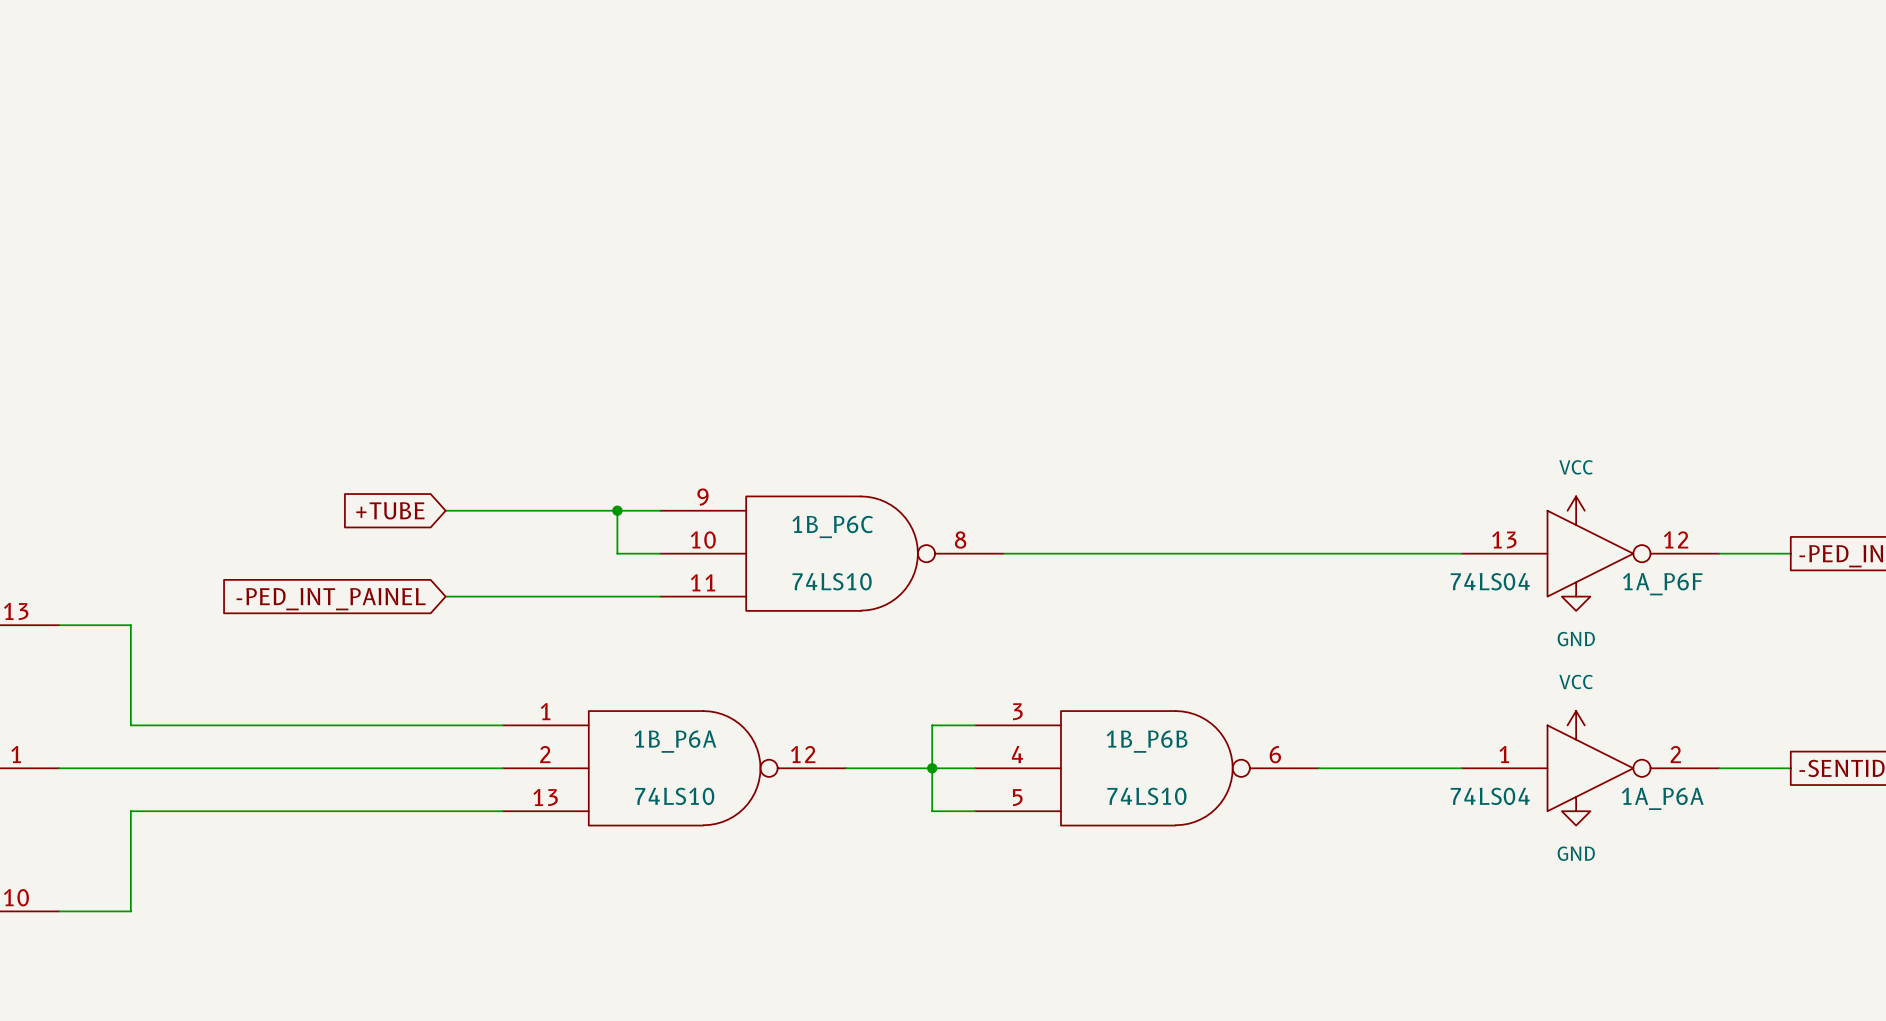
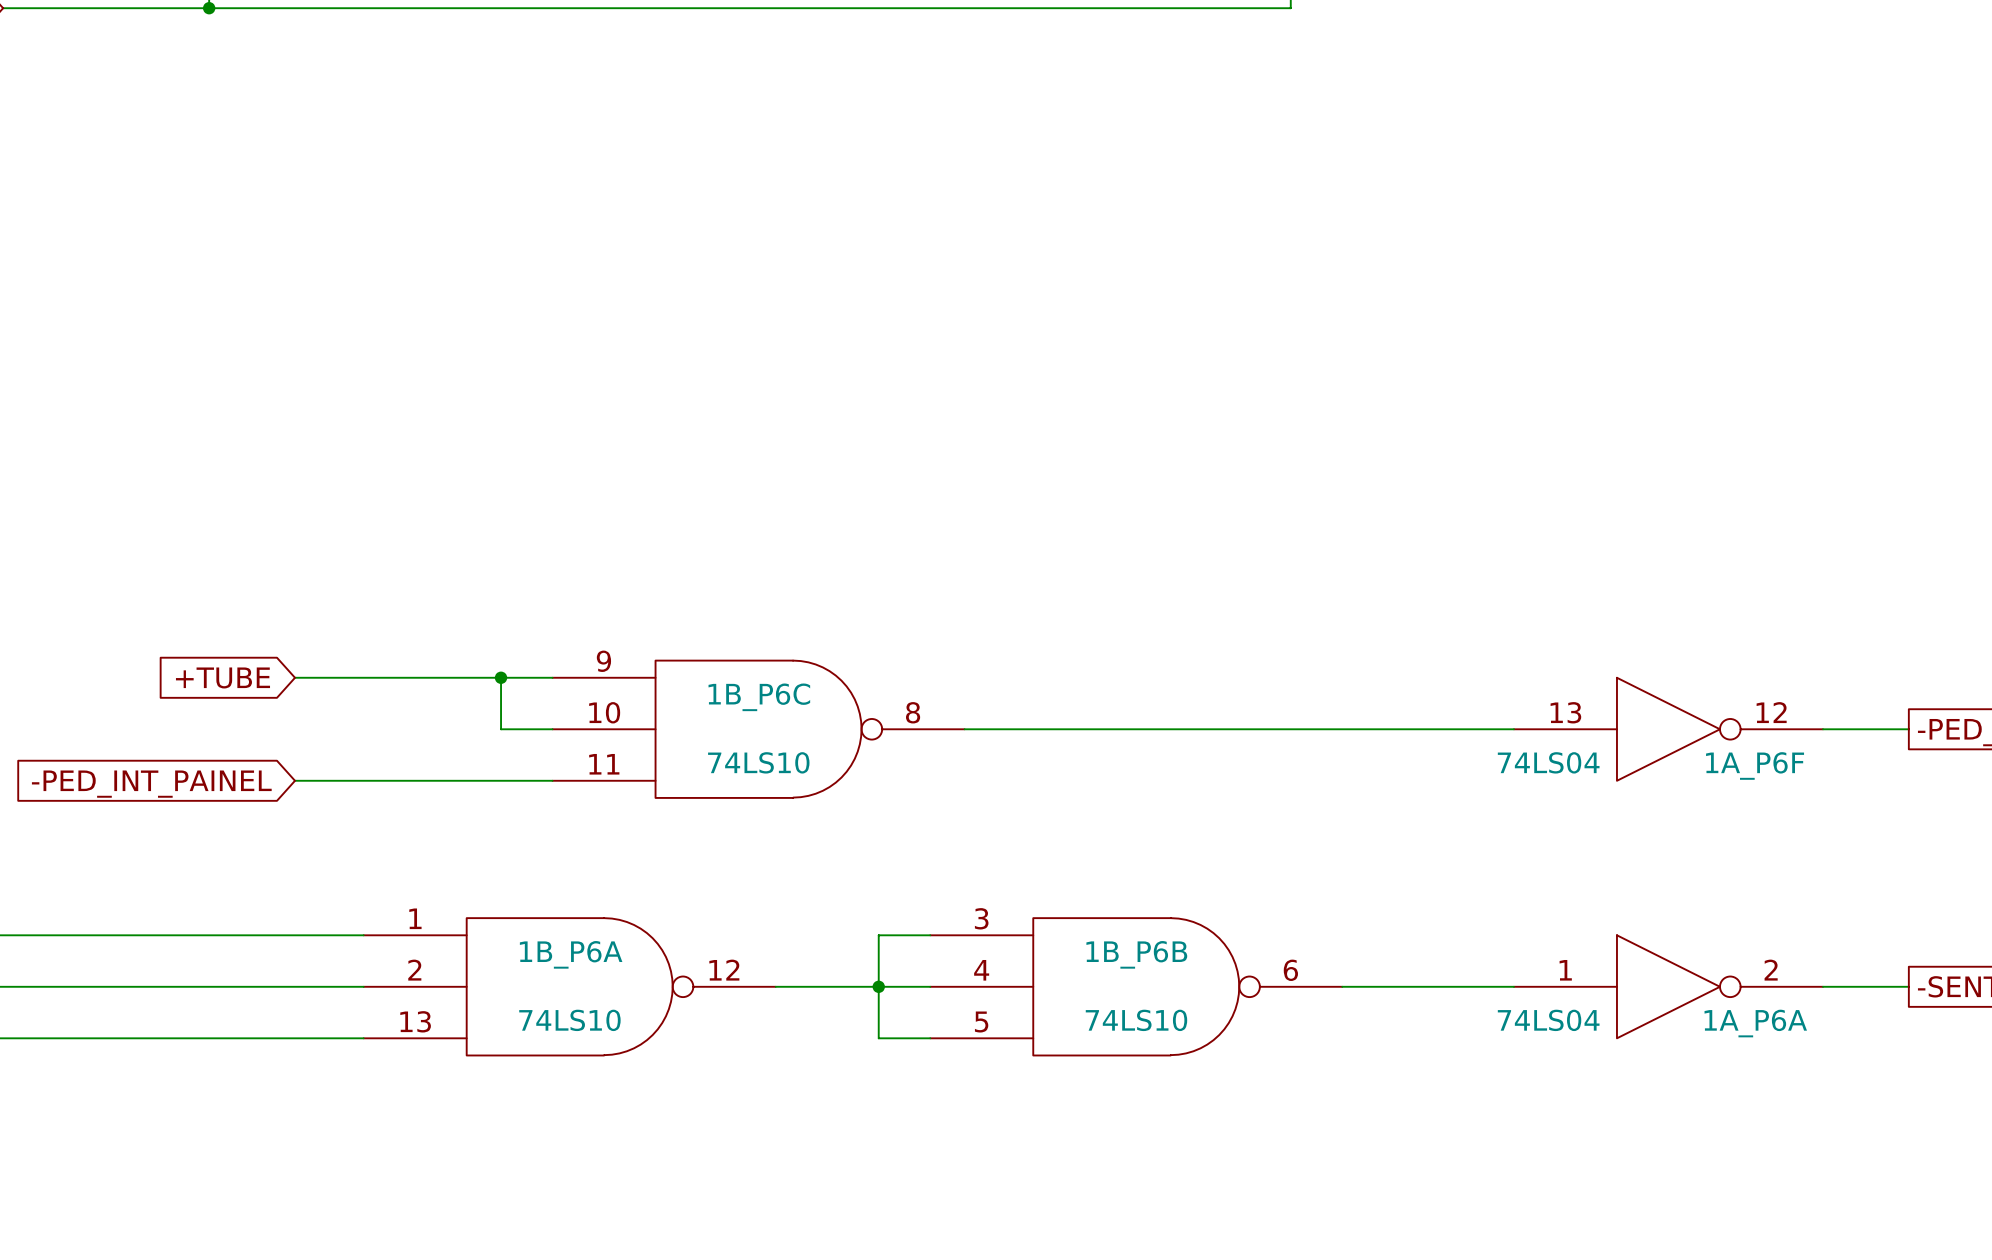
power symbol: VCC (1576, 510) -> none
power symbol: GND (1576, 596) -> none
power symbol: VCC (1576, 725) -> none
power symbol: GND (1576, 811) -> none

